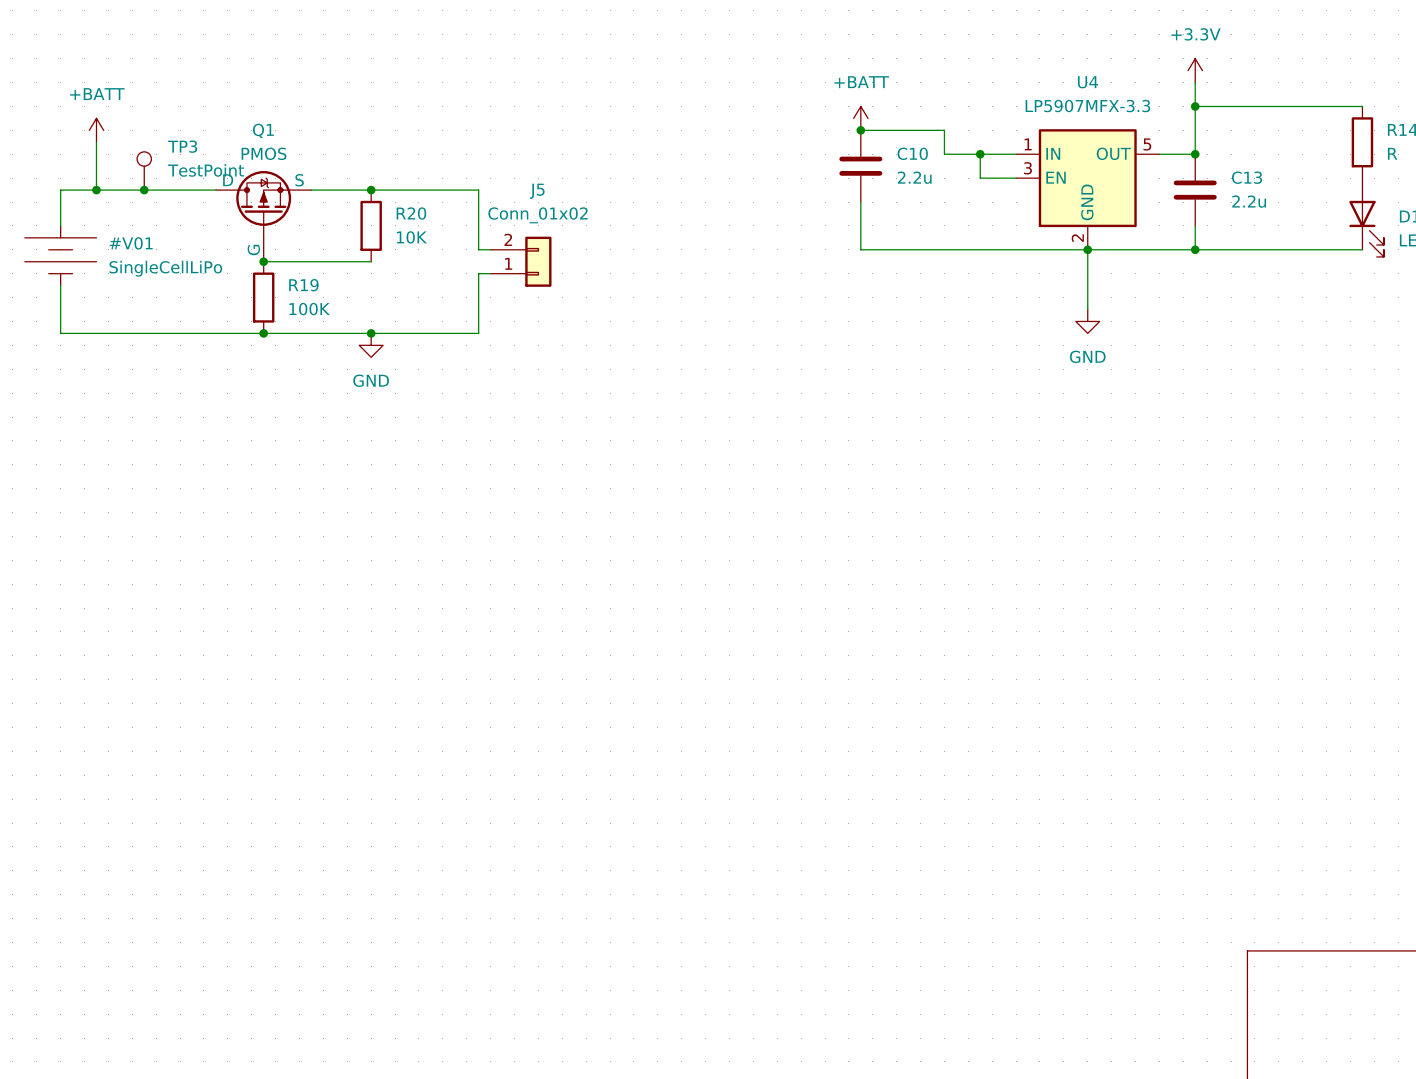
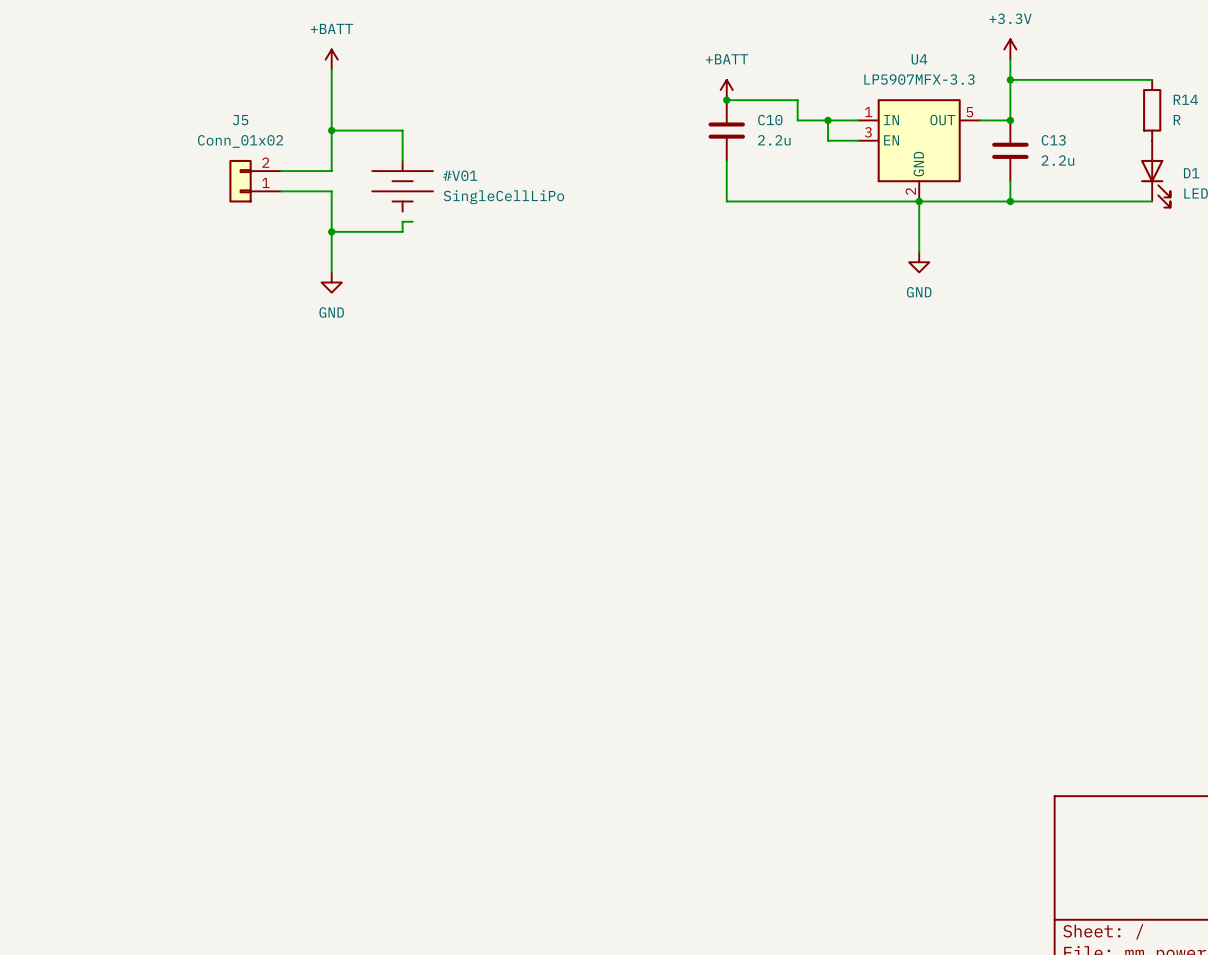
power symbol: none -> +BATT (331, 59)
wire: none -> (331, 69) (331, 171) (281, 171)
power symbol: +BATT (96, 130) -> none
wire: (96, 142) (96, 190) -> none
TP3: TestPoint (144, 170) -> none
junction: (96, 190) -> none
junction: (144, 190) -> none
wire: (215, 190) (60, 190) (60, 225) -> none
wire: (311, 190) (478, 190) -> (331, 130) (402, 130) (402, 150)
junction position: (371, 190) -> (331, 130)
wire: (478, 202) (478, 249) (490, 249) -> none
Q1: PMOS (263, 216) -> none
R20: 10K (371, 225) -> none
wire: none -> (281, 191) (331, 191) (331, 272)
#V01 position: SingleCellLiPo (60, 255) -> SingleCellLiPo (402, 186)
wire: (263, 261) (371, 261) -> none
junction: (263, 261) -> none
J5 position: (521, 261) -> (255, 181)
J5 flip: as is (538, 261) -> left-right (240, 181)
wire: (60, 285) (60, 333) (478, 333) (478, 285) -> (331, 231) (402, 231)
junction: none -> (331, 231)
R19: 100K (263, 297) -> none
junction: (263, 333) -> none
junction: (371, 333) -> none
power symbol position: GND (371, 345) -> GND (331, 282)

